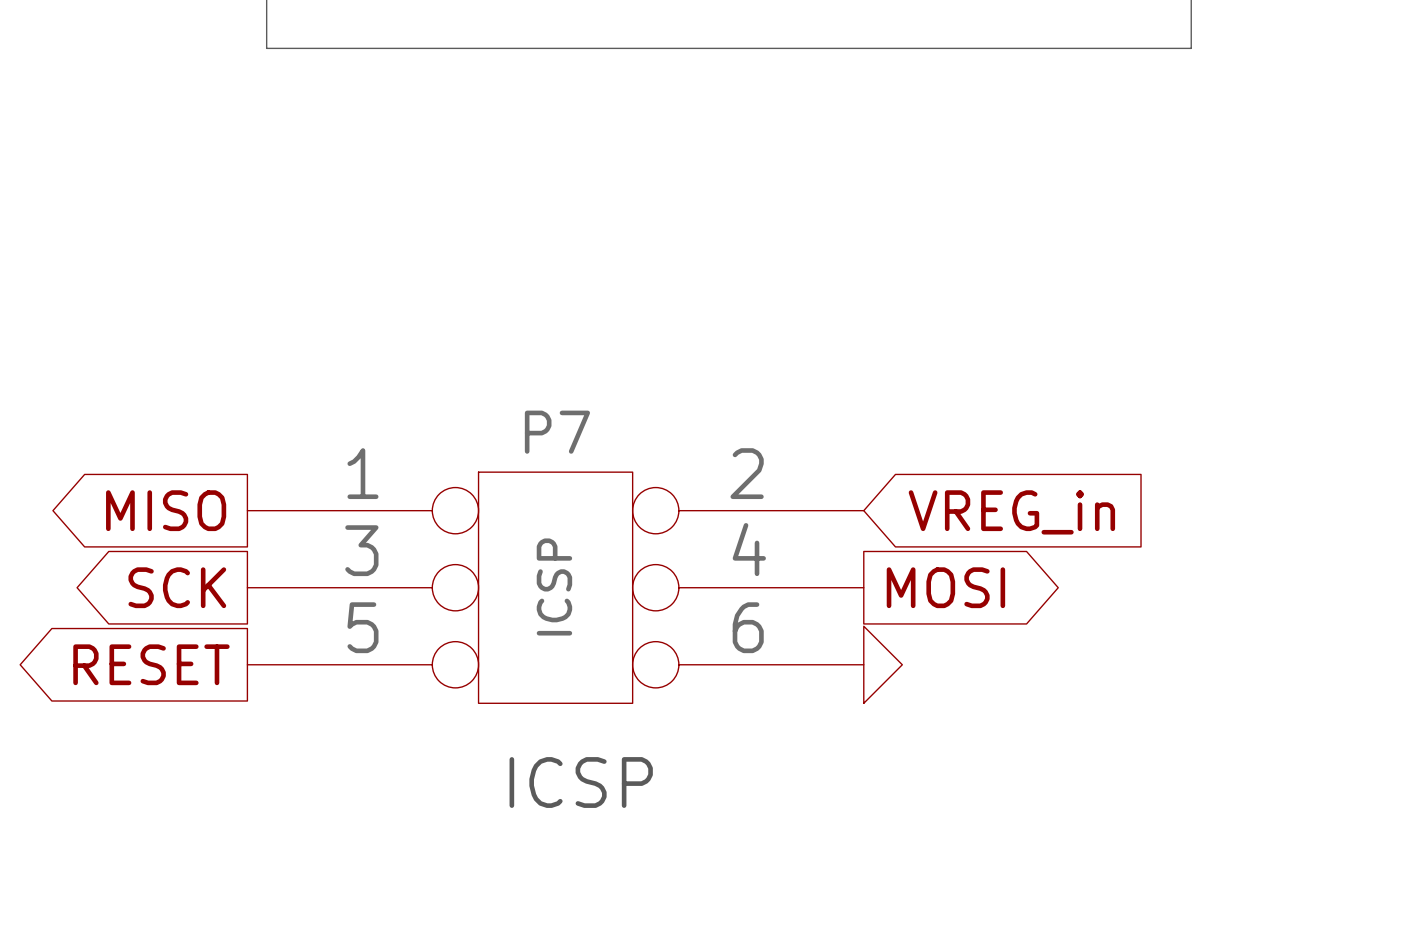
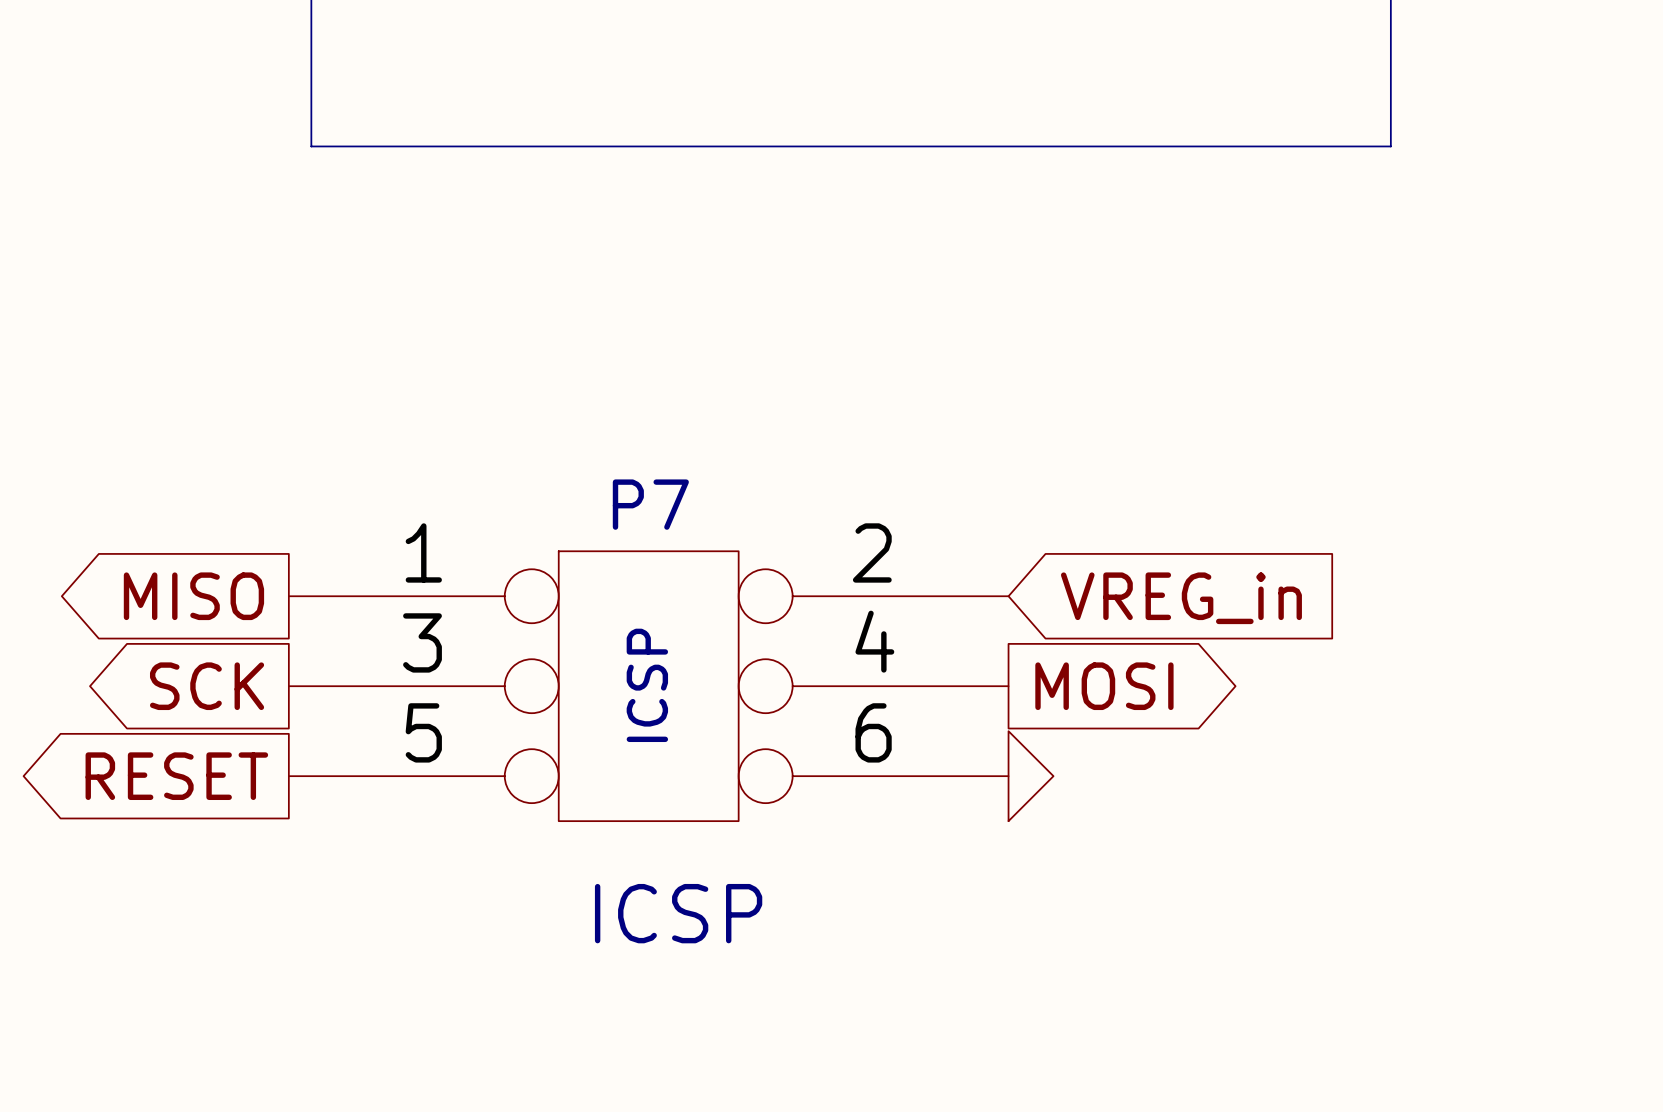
bus: (266, 48) (1191, 48) -> (311, 56) (311, 146) (1390, 146) (1390, 56)

